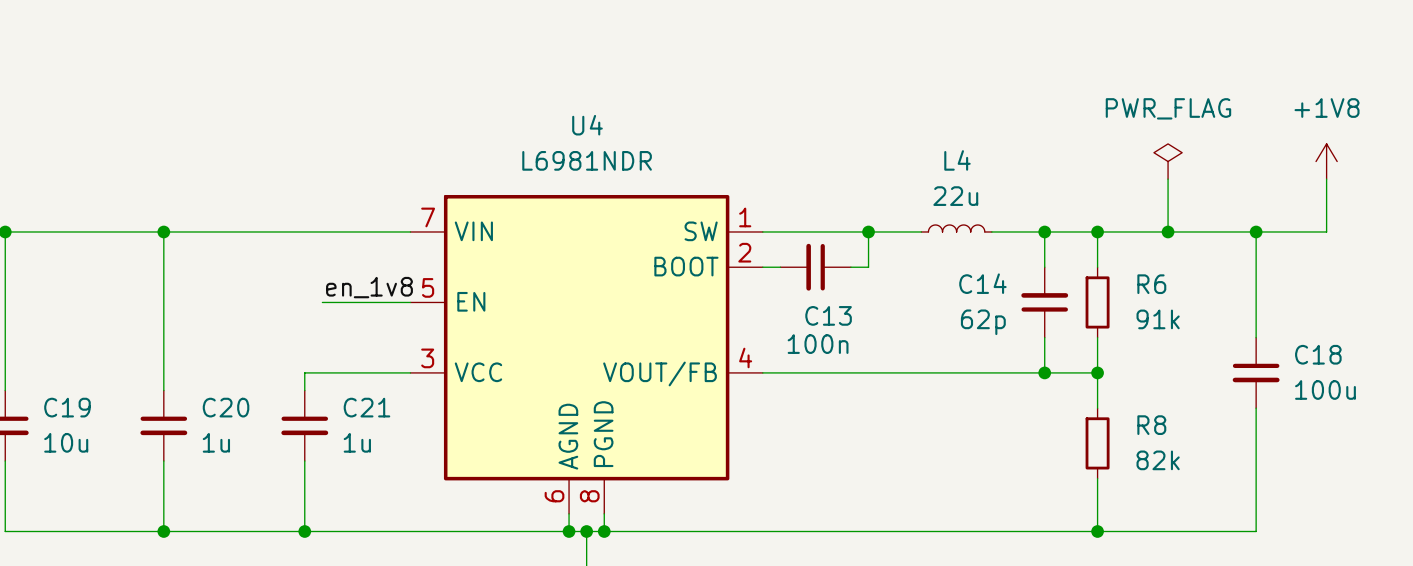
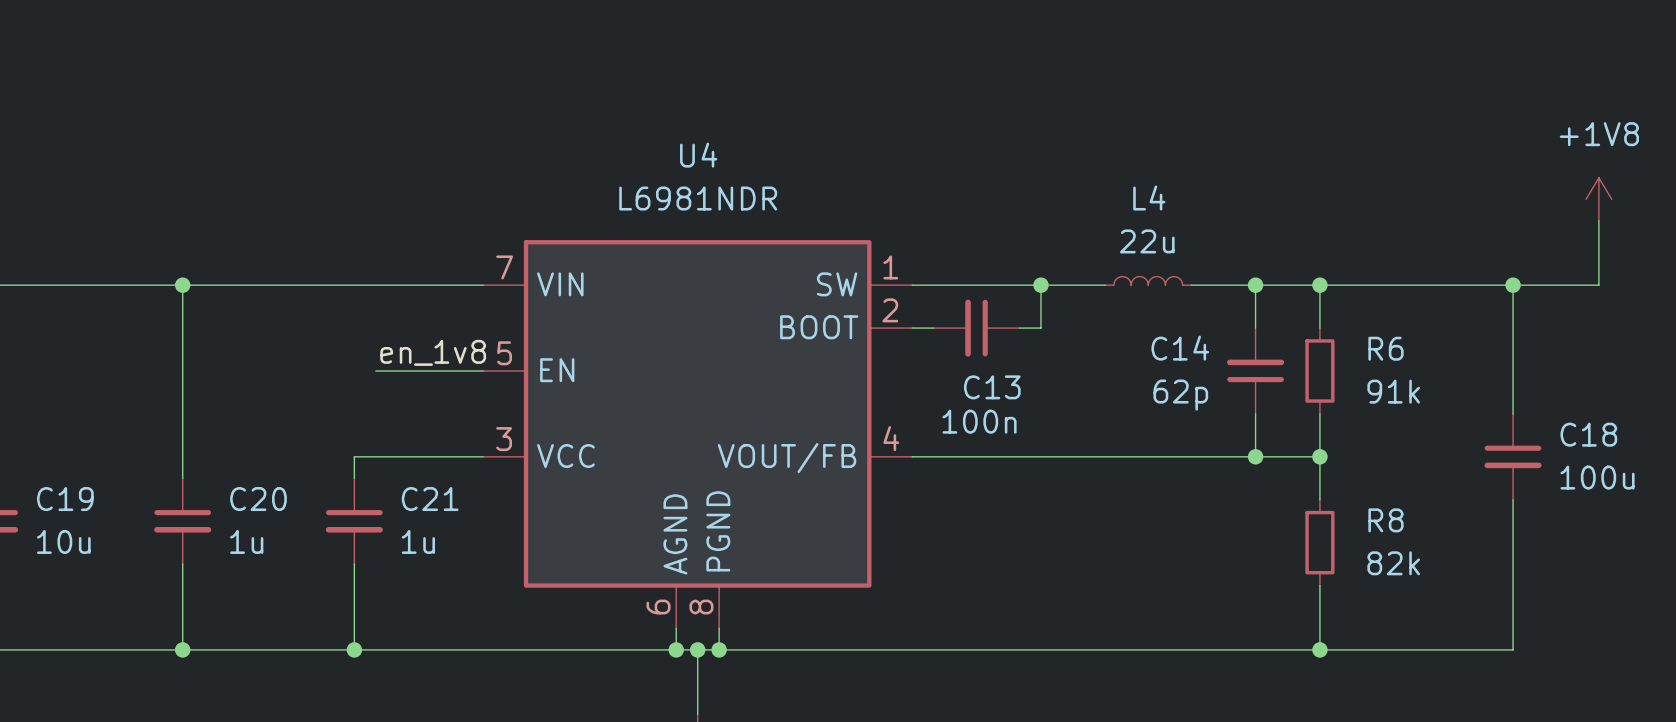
power symbol: PWR_FLAG (1168, 161) -> none
wire: (1168, 179) (1168, 231) -> none
junction: (1168, 231) -> none

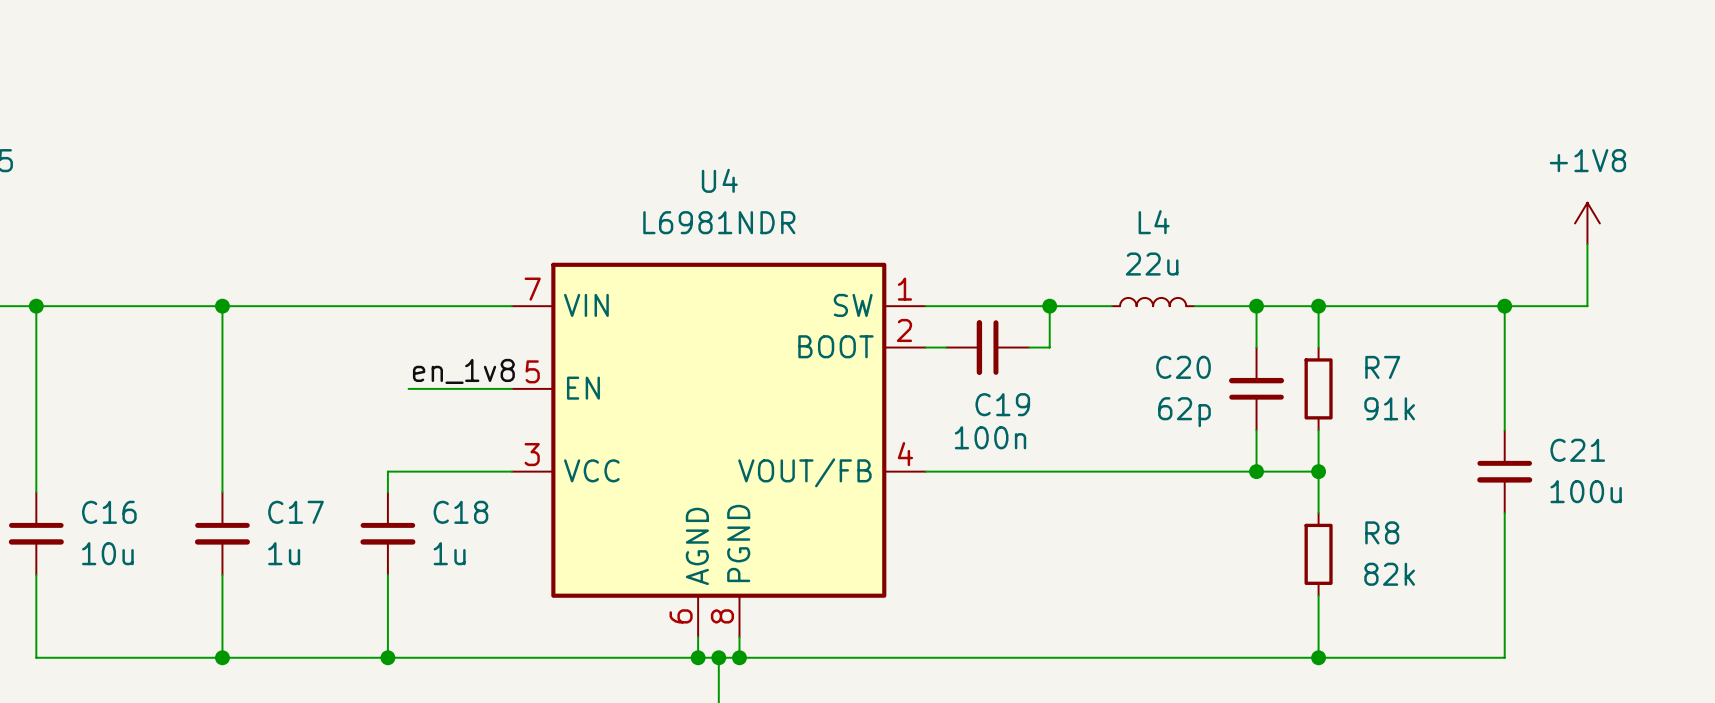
C14 name: C14 (1180, 348) -> C20 (1183, 367)
R6 name: R6 (1386, 348) -> R7 (1382, 367)
C13 name: C13 (992, 387) -> C19 (1002, 404)
C18 name: C18 (1588, 434) -> C21 (1577, 450)
C19 name: C19 (65, 499) -> C16 (109, 512)
C20 name: C20 (258, 499) -> C17 (295, 512)
C21 name: C21 (430, 499) -> C18 (460, 512)

